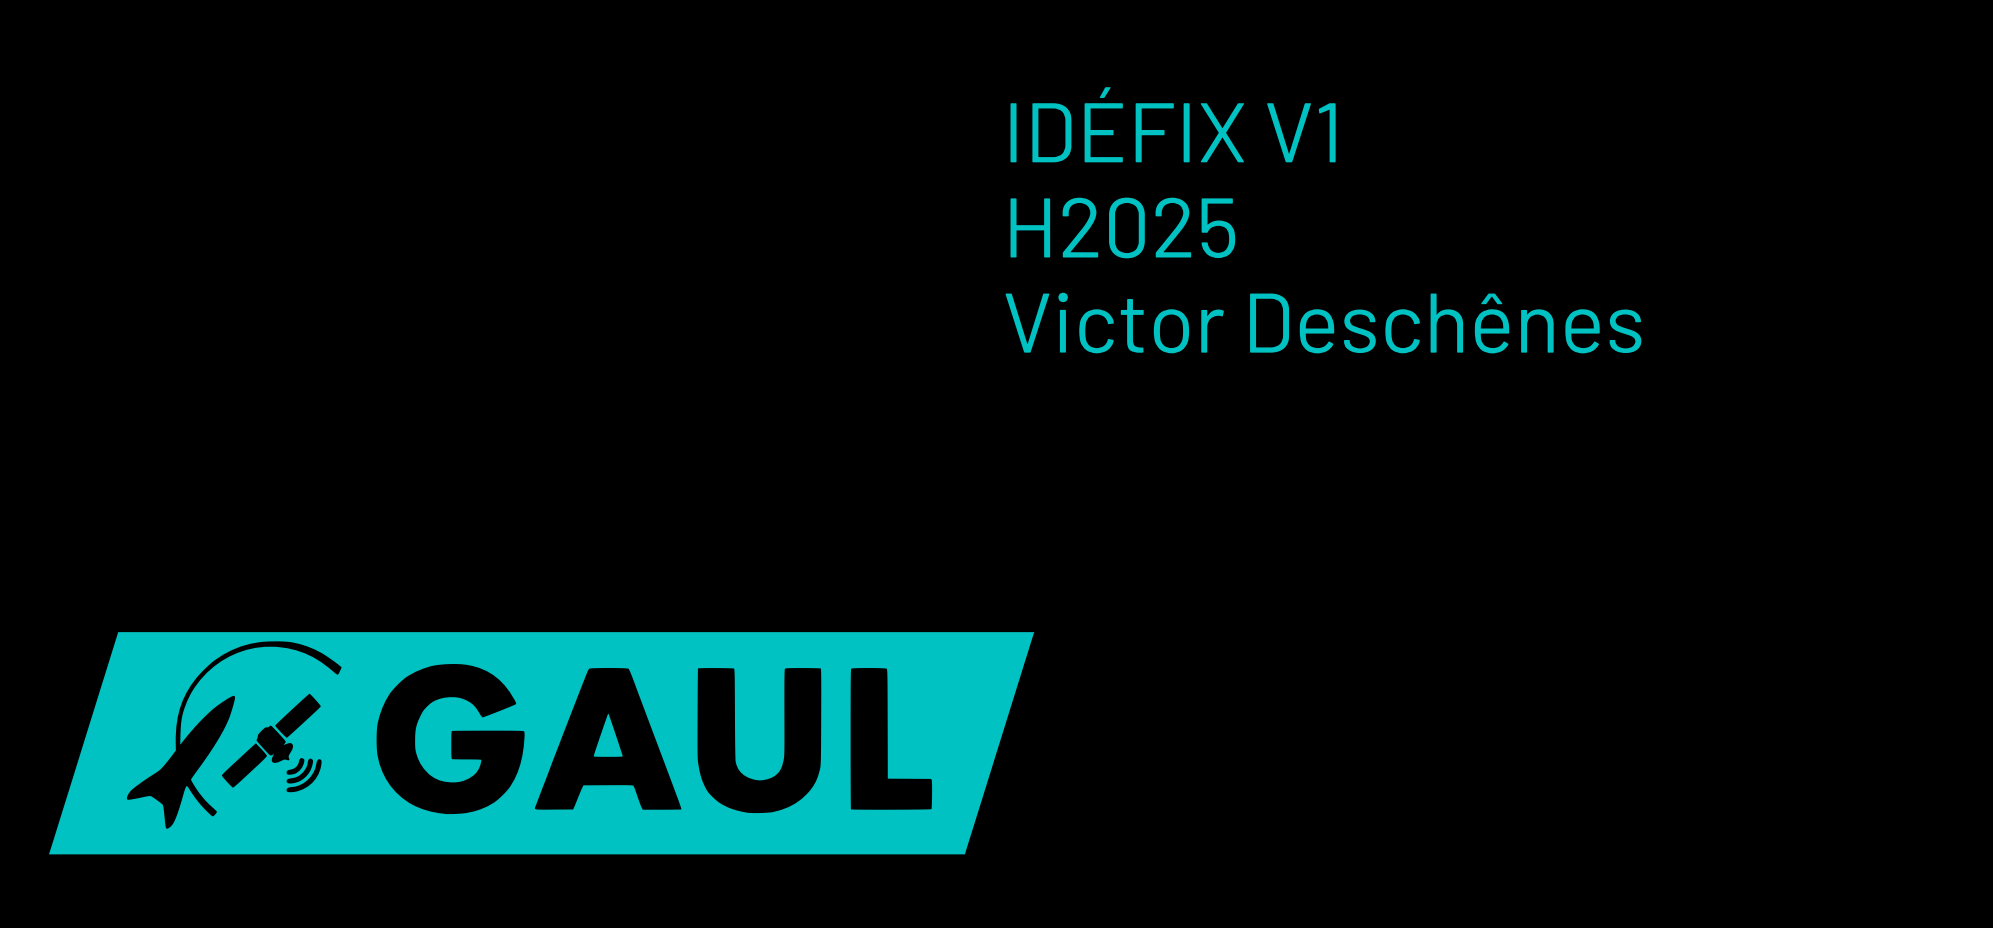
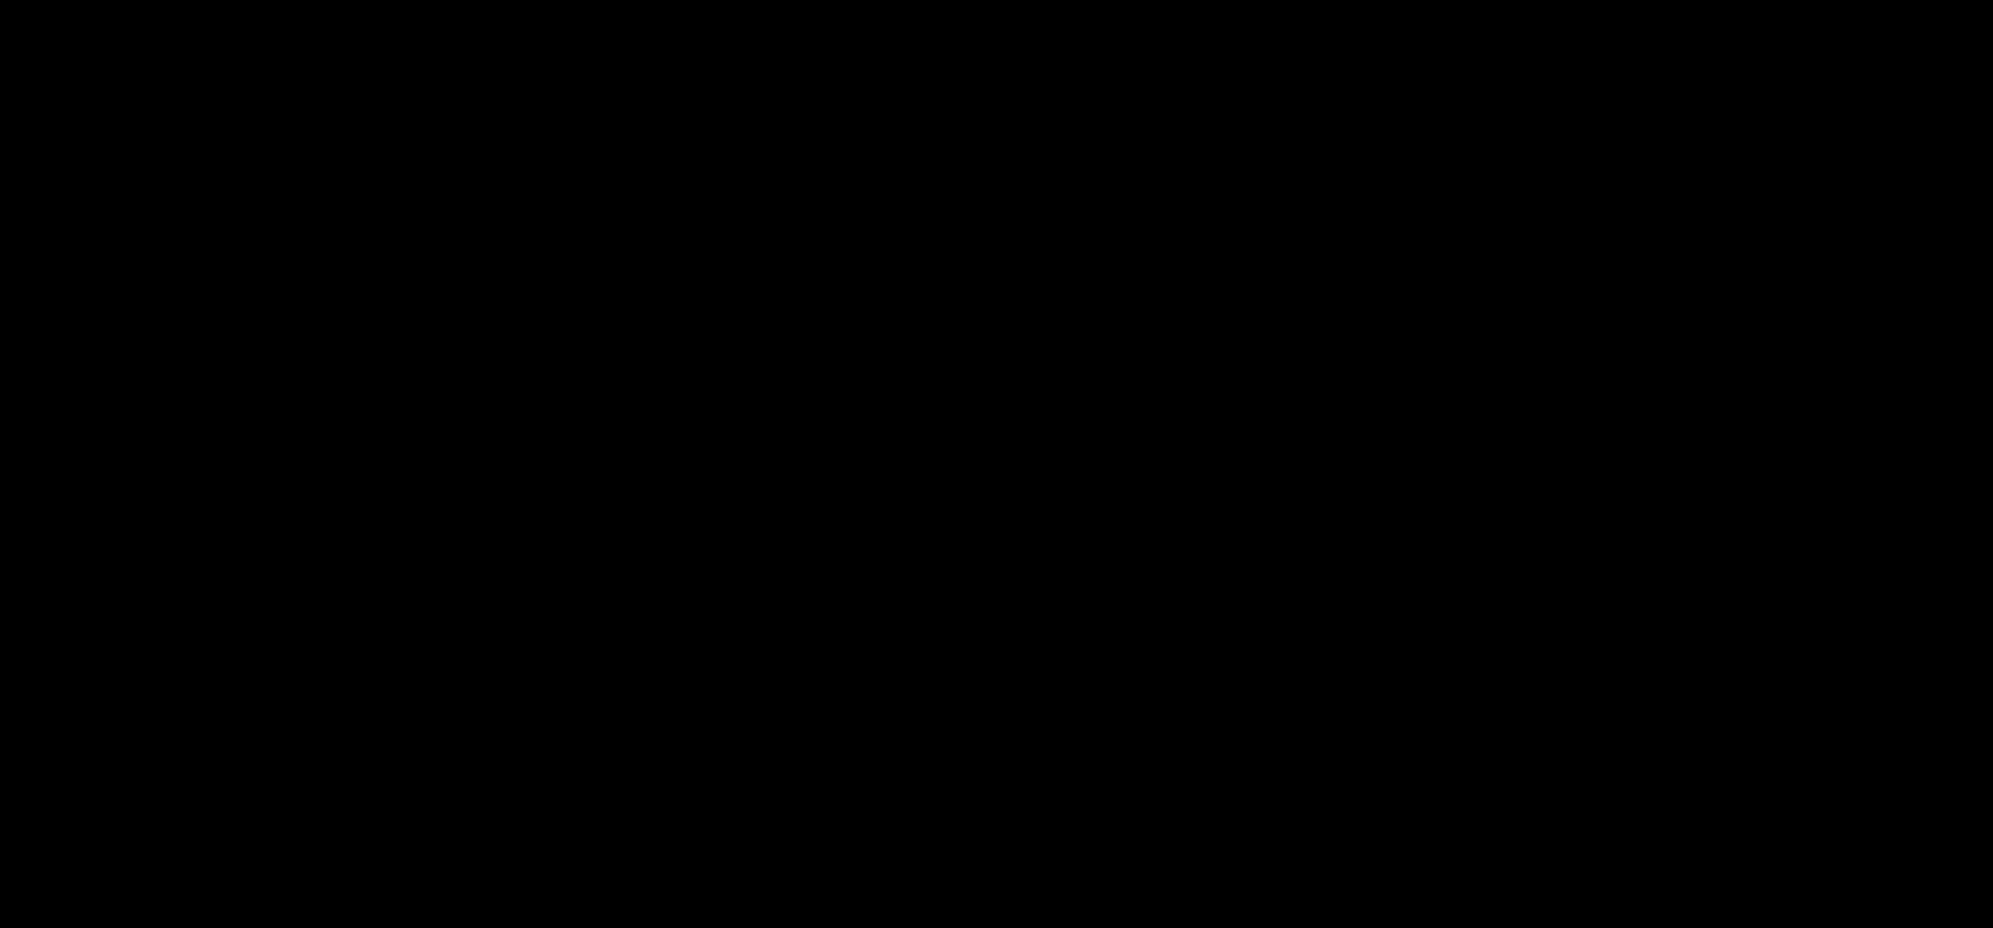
text: IDÉFIX V1 (1173, 124) -> none
text: H2025 (1122, 227) -> none
text: Victor Deschênes (1323, 323) -> none
drawing: [48, 632, 1035, 855] -> none

